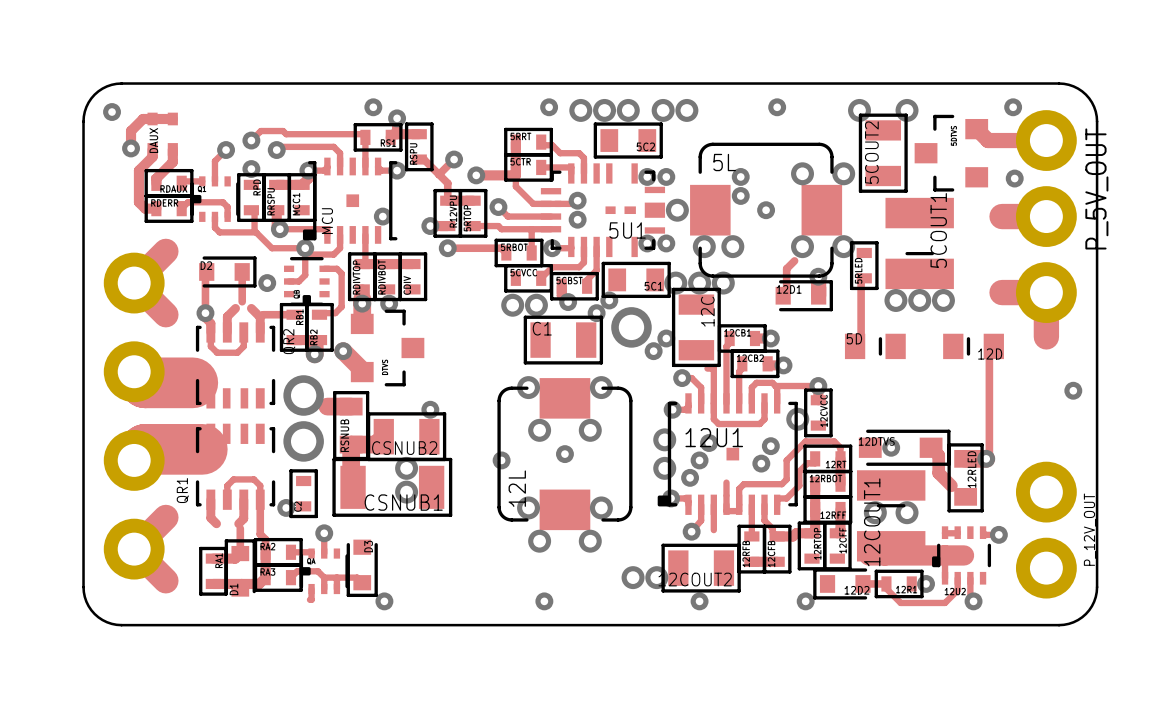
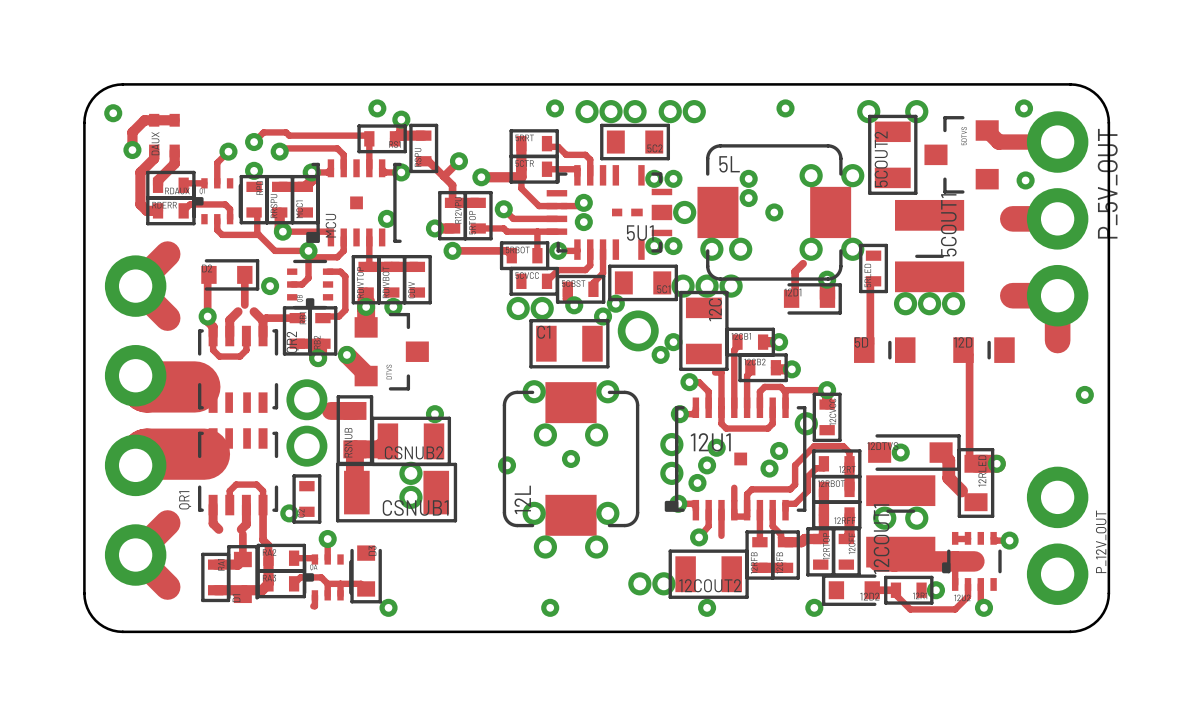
track: none -> (963, 350) (969, 354) (969, 457) (975, 463)
12D rotation: 0° (973, 346) -> 180° (983, 350)
track: (993, 346) (989, 350) (989, 455) (986, 458) -> none

